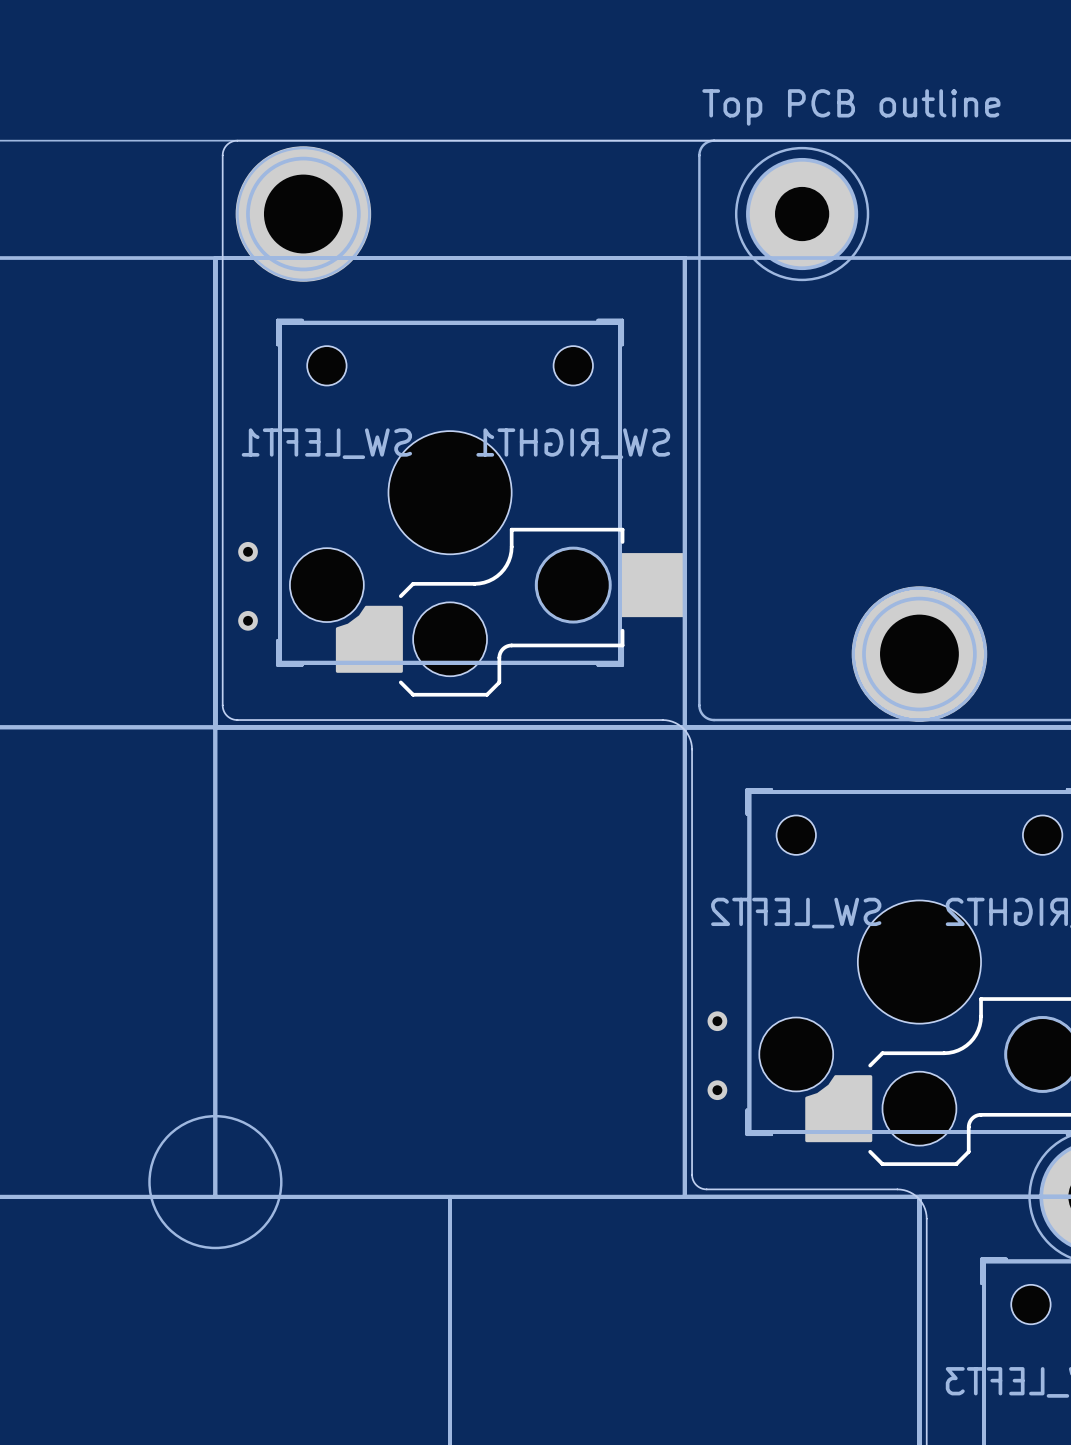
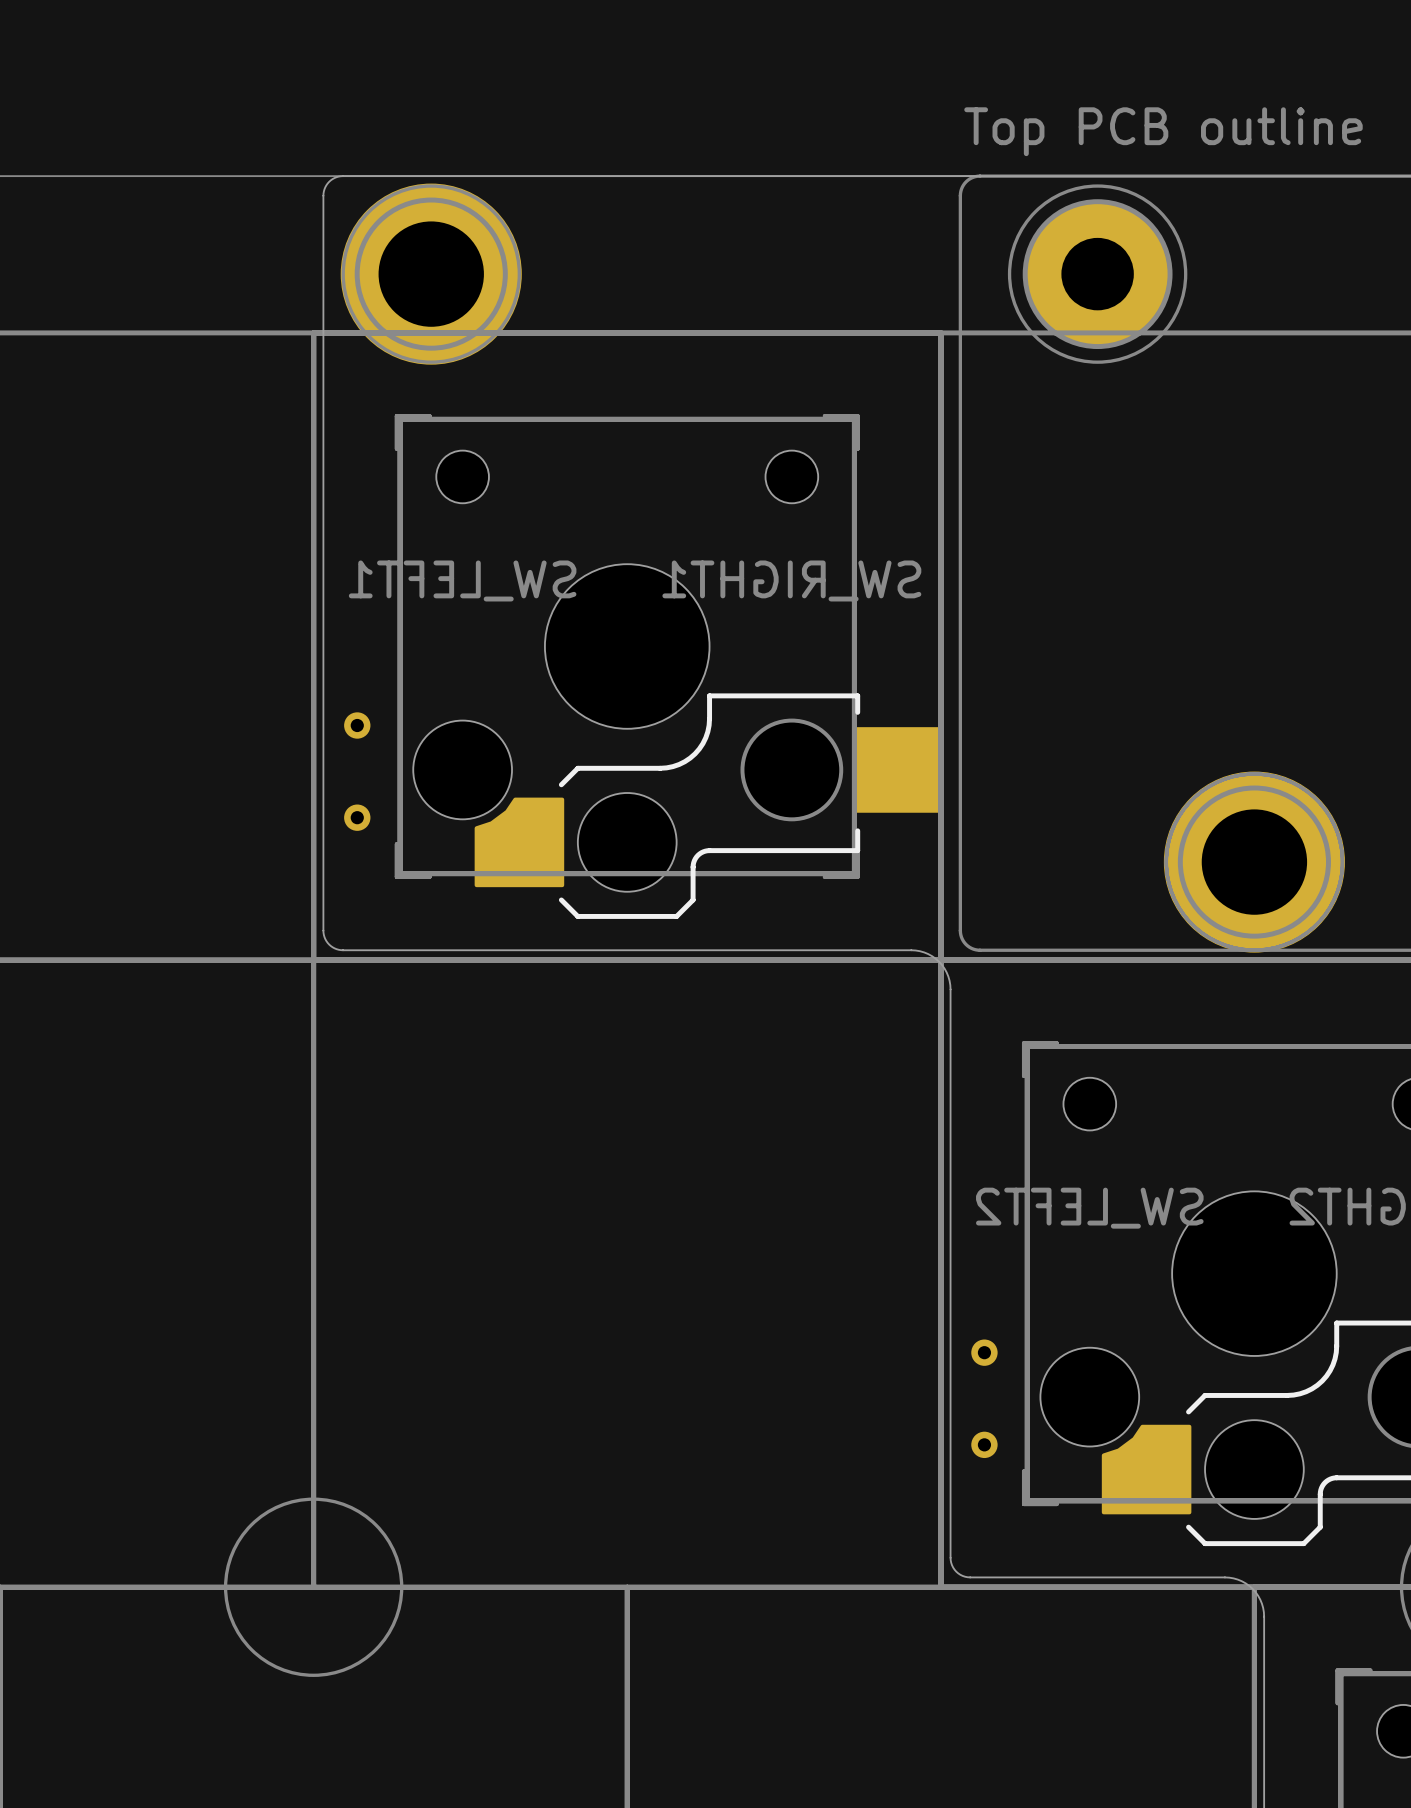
drawing position: (215, 1182) -> (313, 1587)

